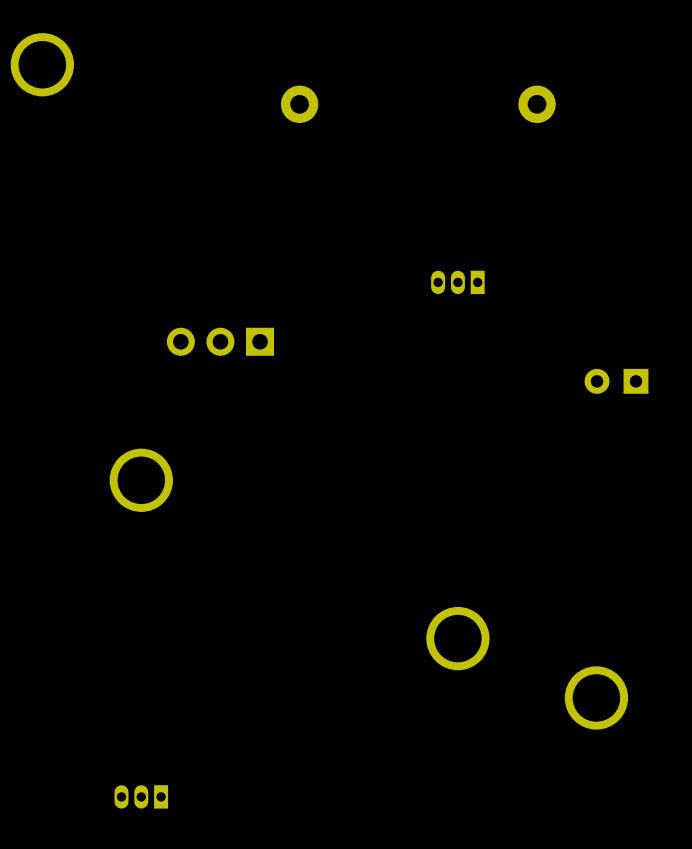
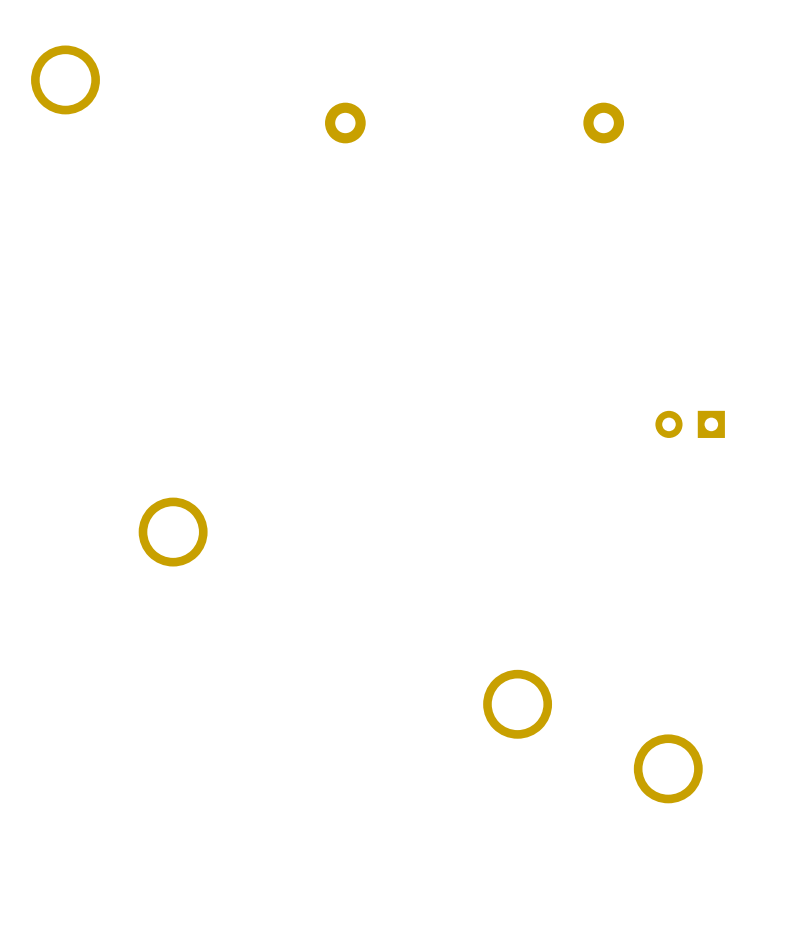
part: (457, 282) -> none
part: (220, 341) -> none
part: (141, 796) -> none

